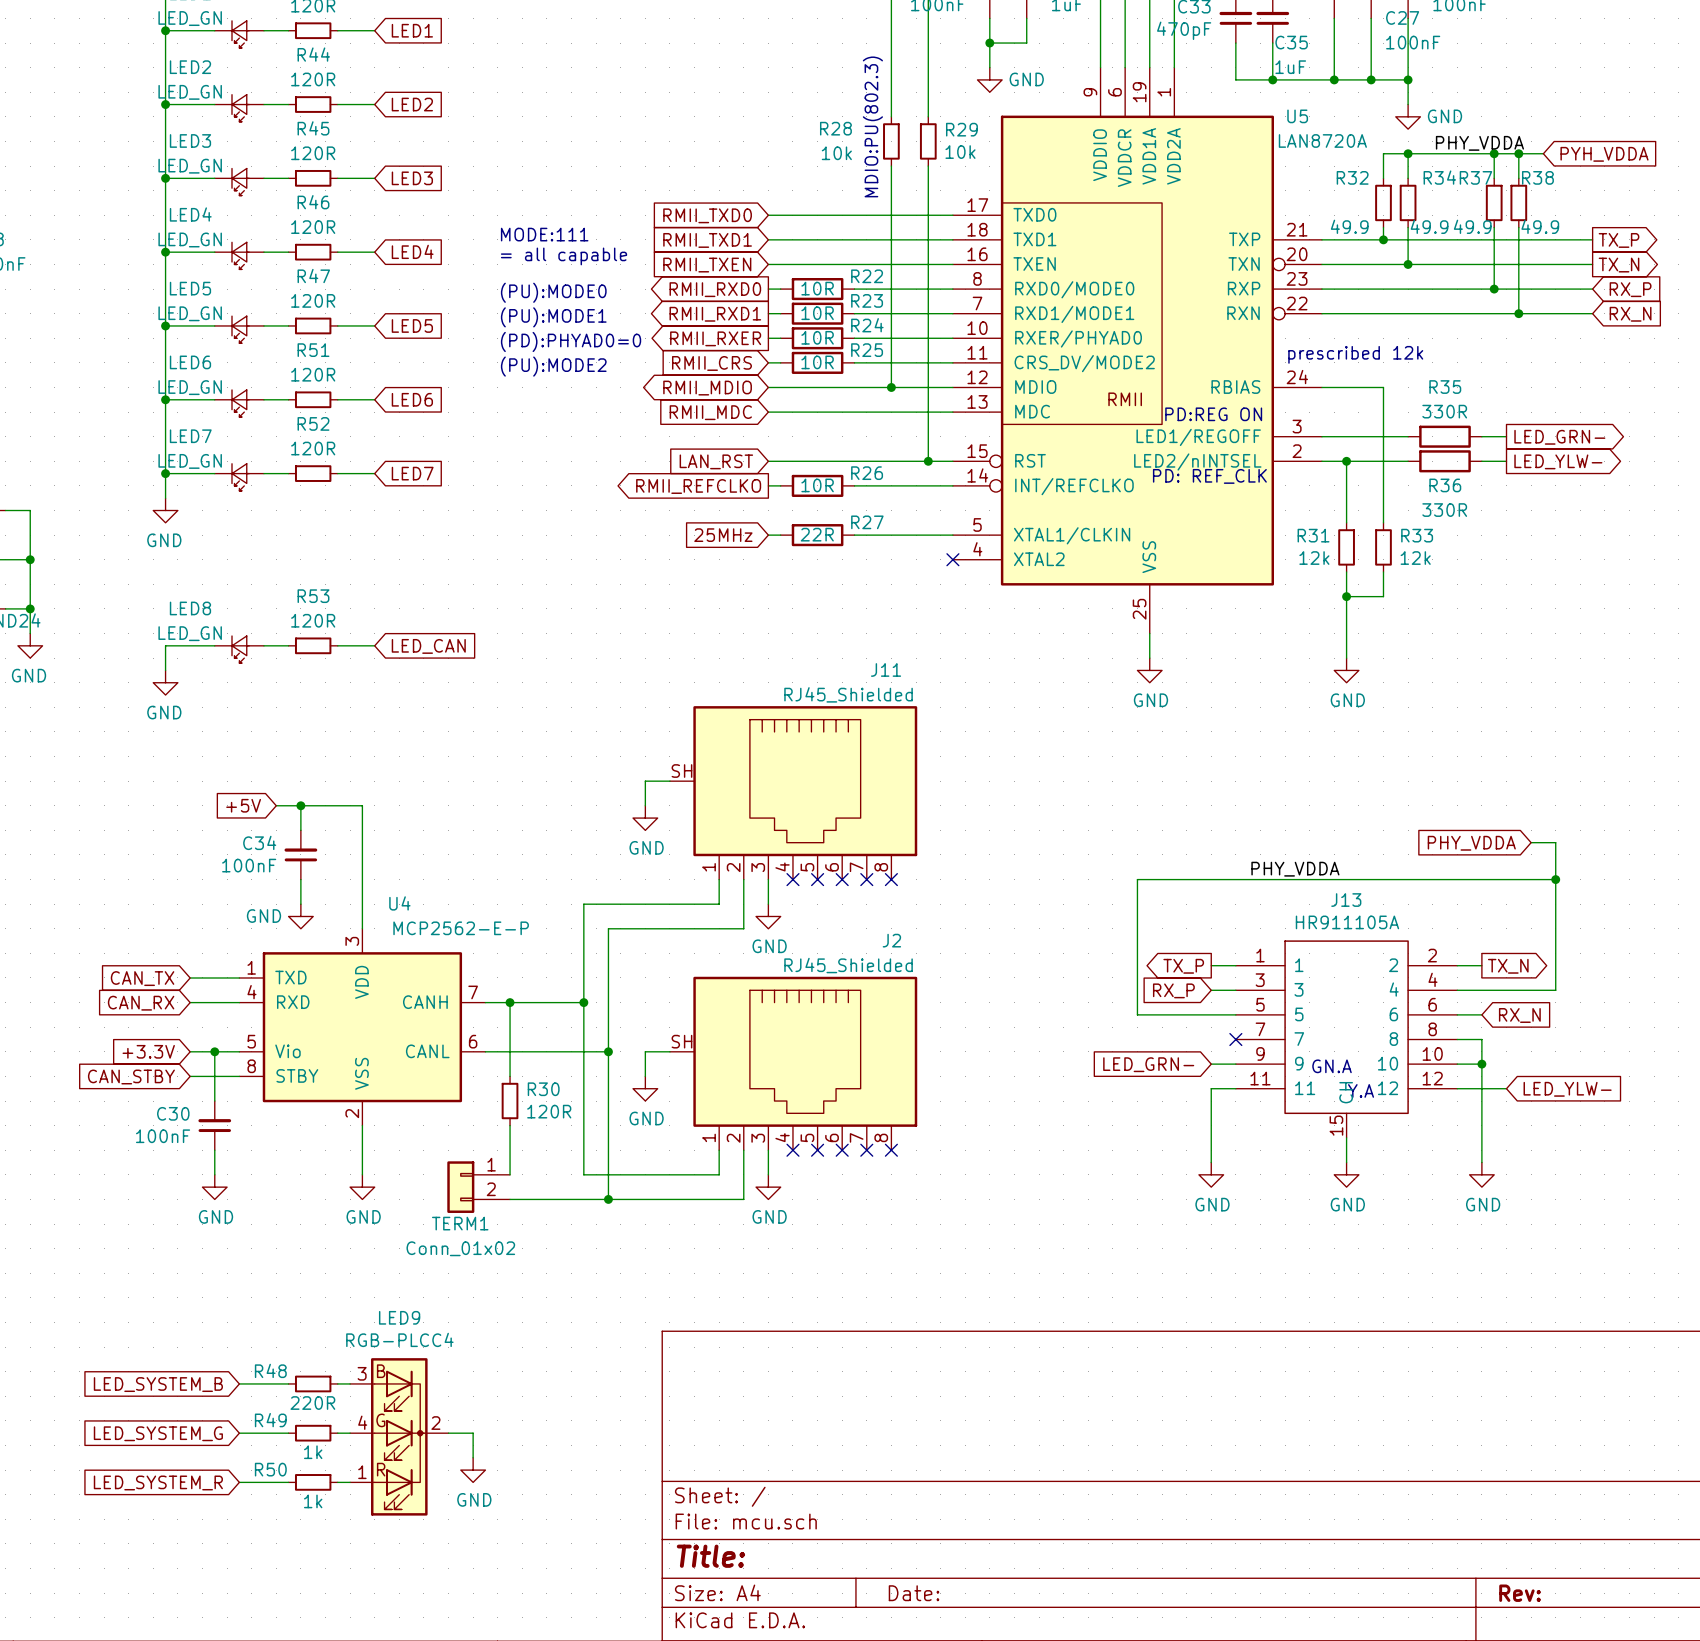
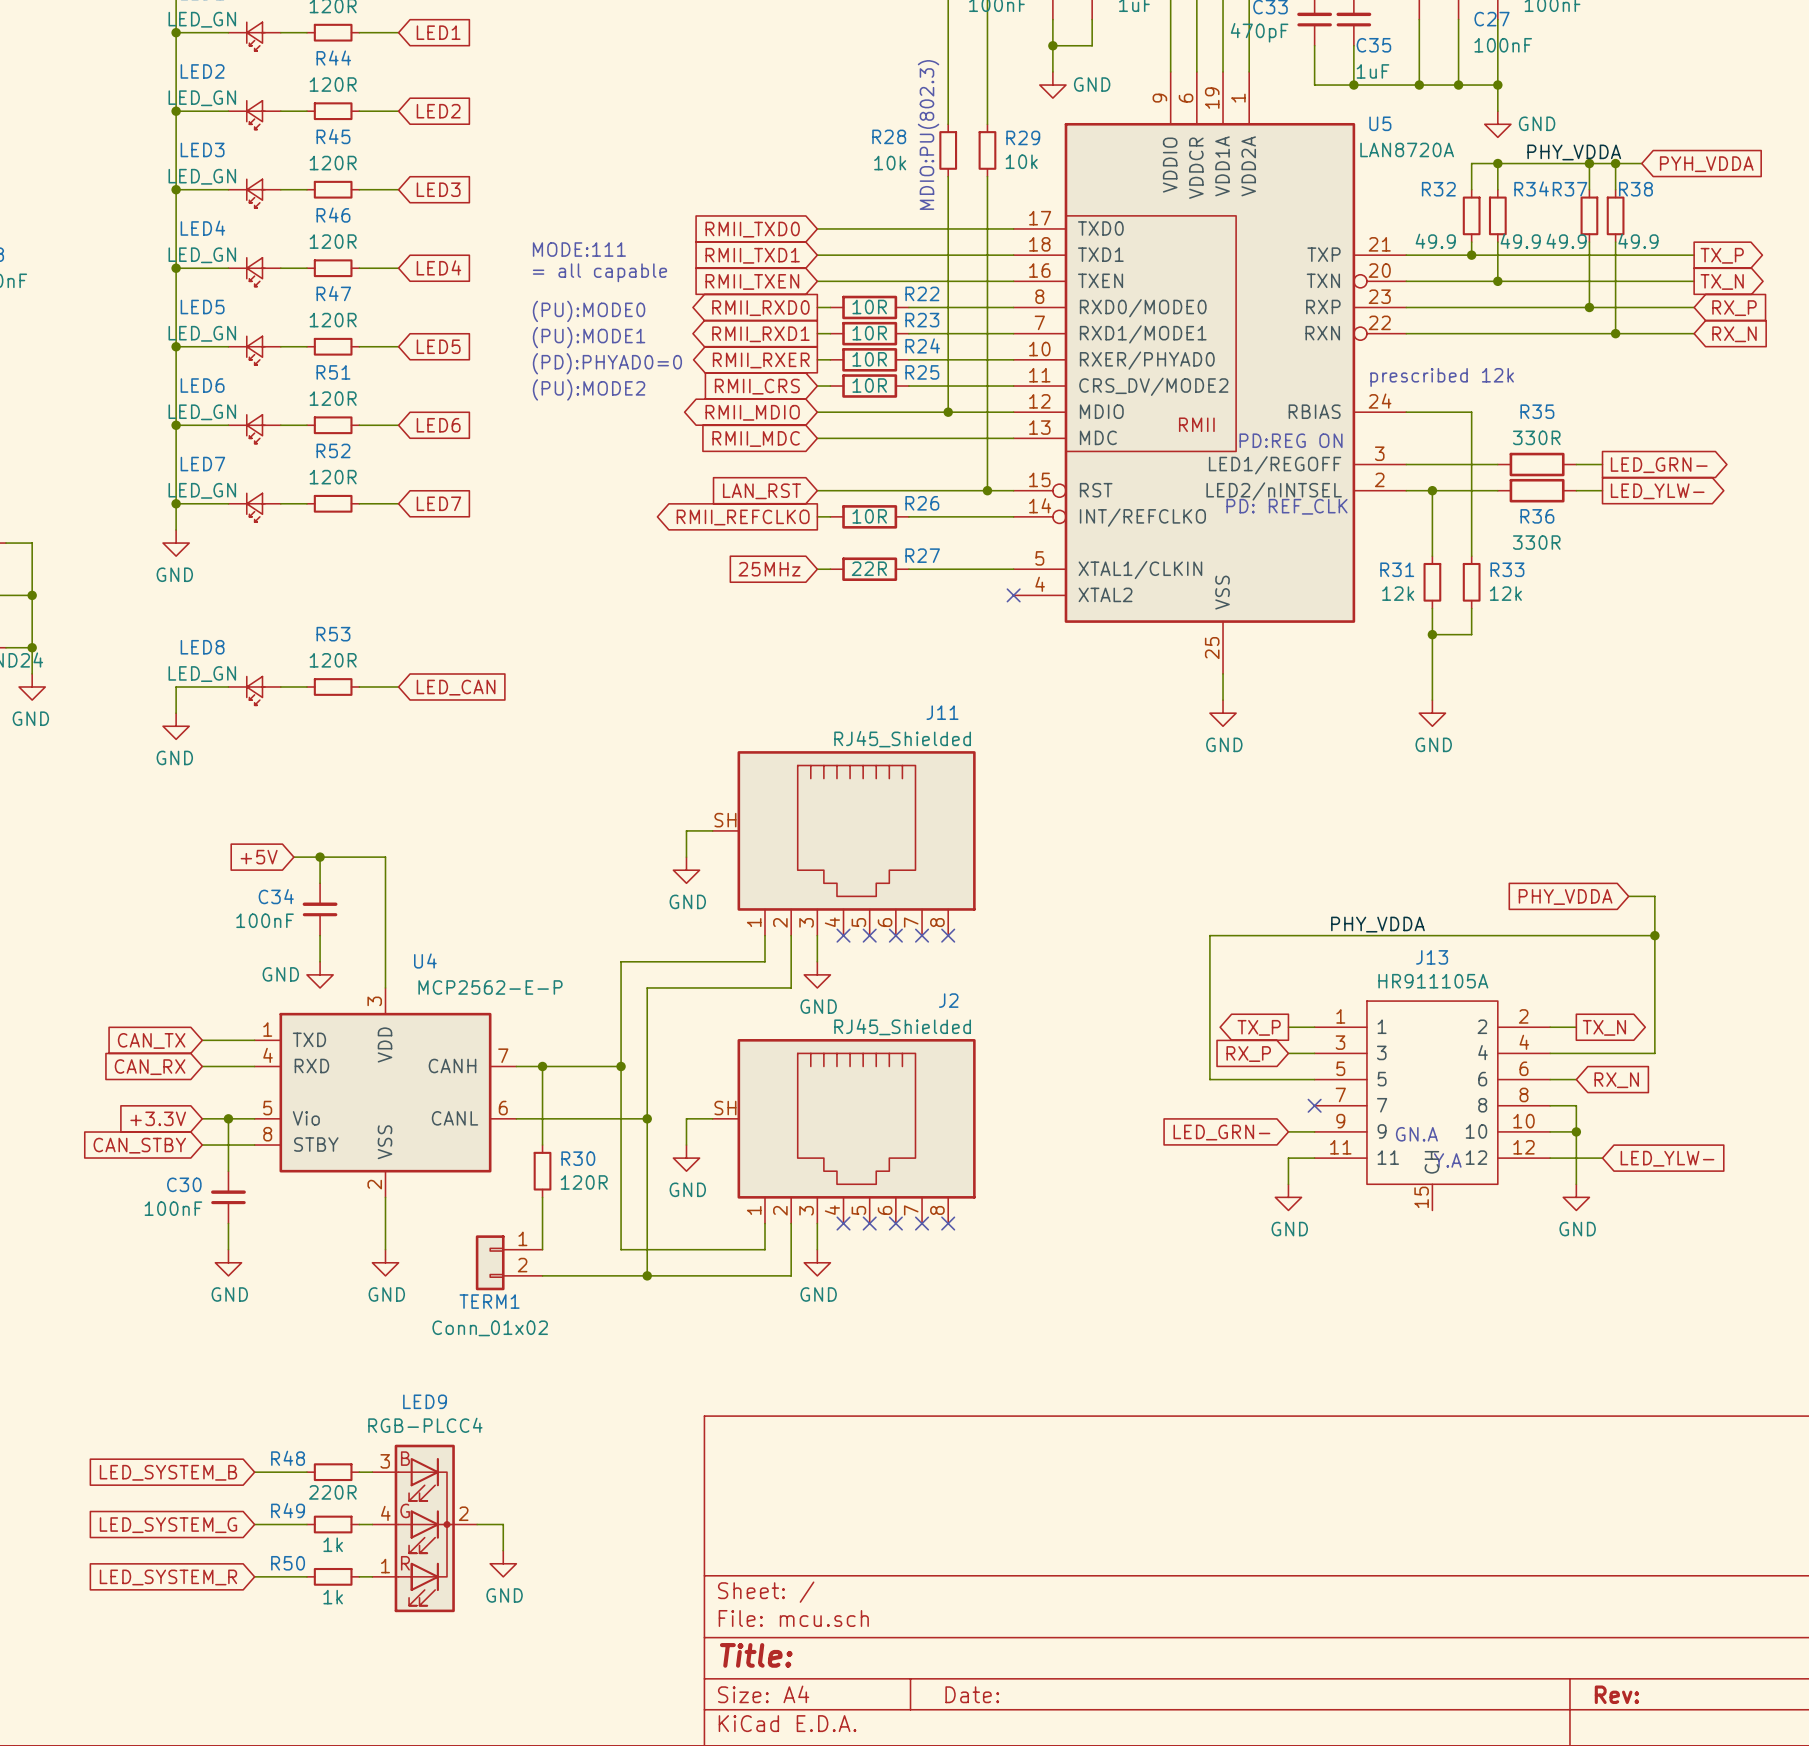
wire: (1211, 1113) (1211, 1162) -> none
wire: (1481, 1113) (1481, 1162) -> none
wire: (1346, 1137) (1346, 1162) -> none
power symbol position: GND (1211, 1174) -> GND (1288, 1197)
power symbol: GND (1346, 1174) -> none
power symbol position: GND (1481, 1174) -> GND (1576, 1197)

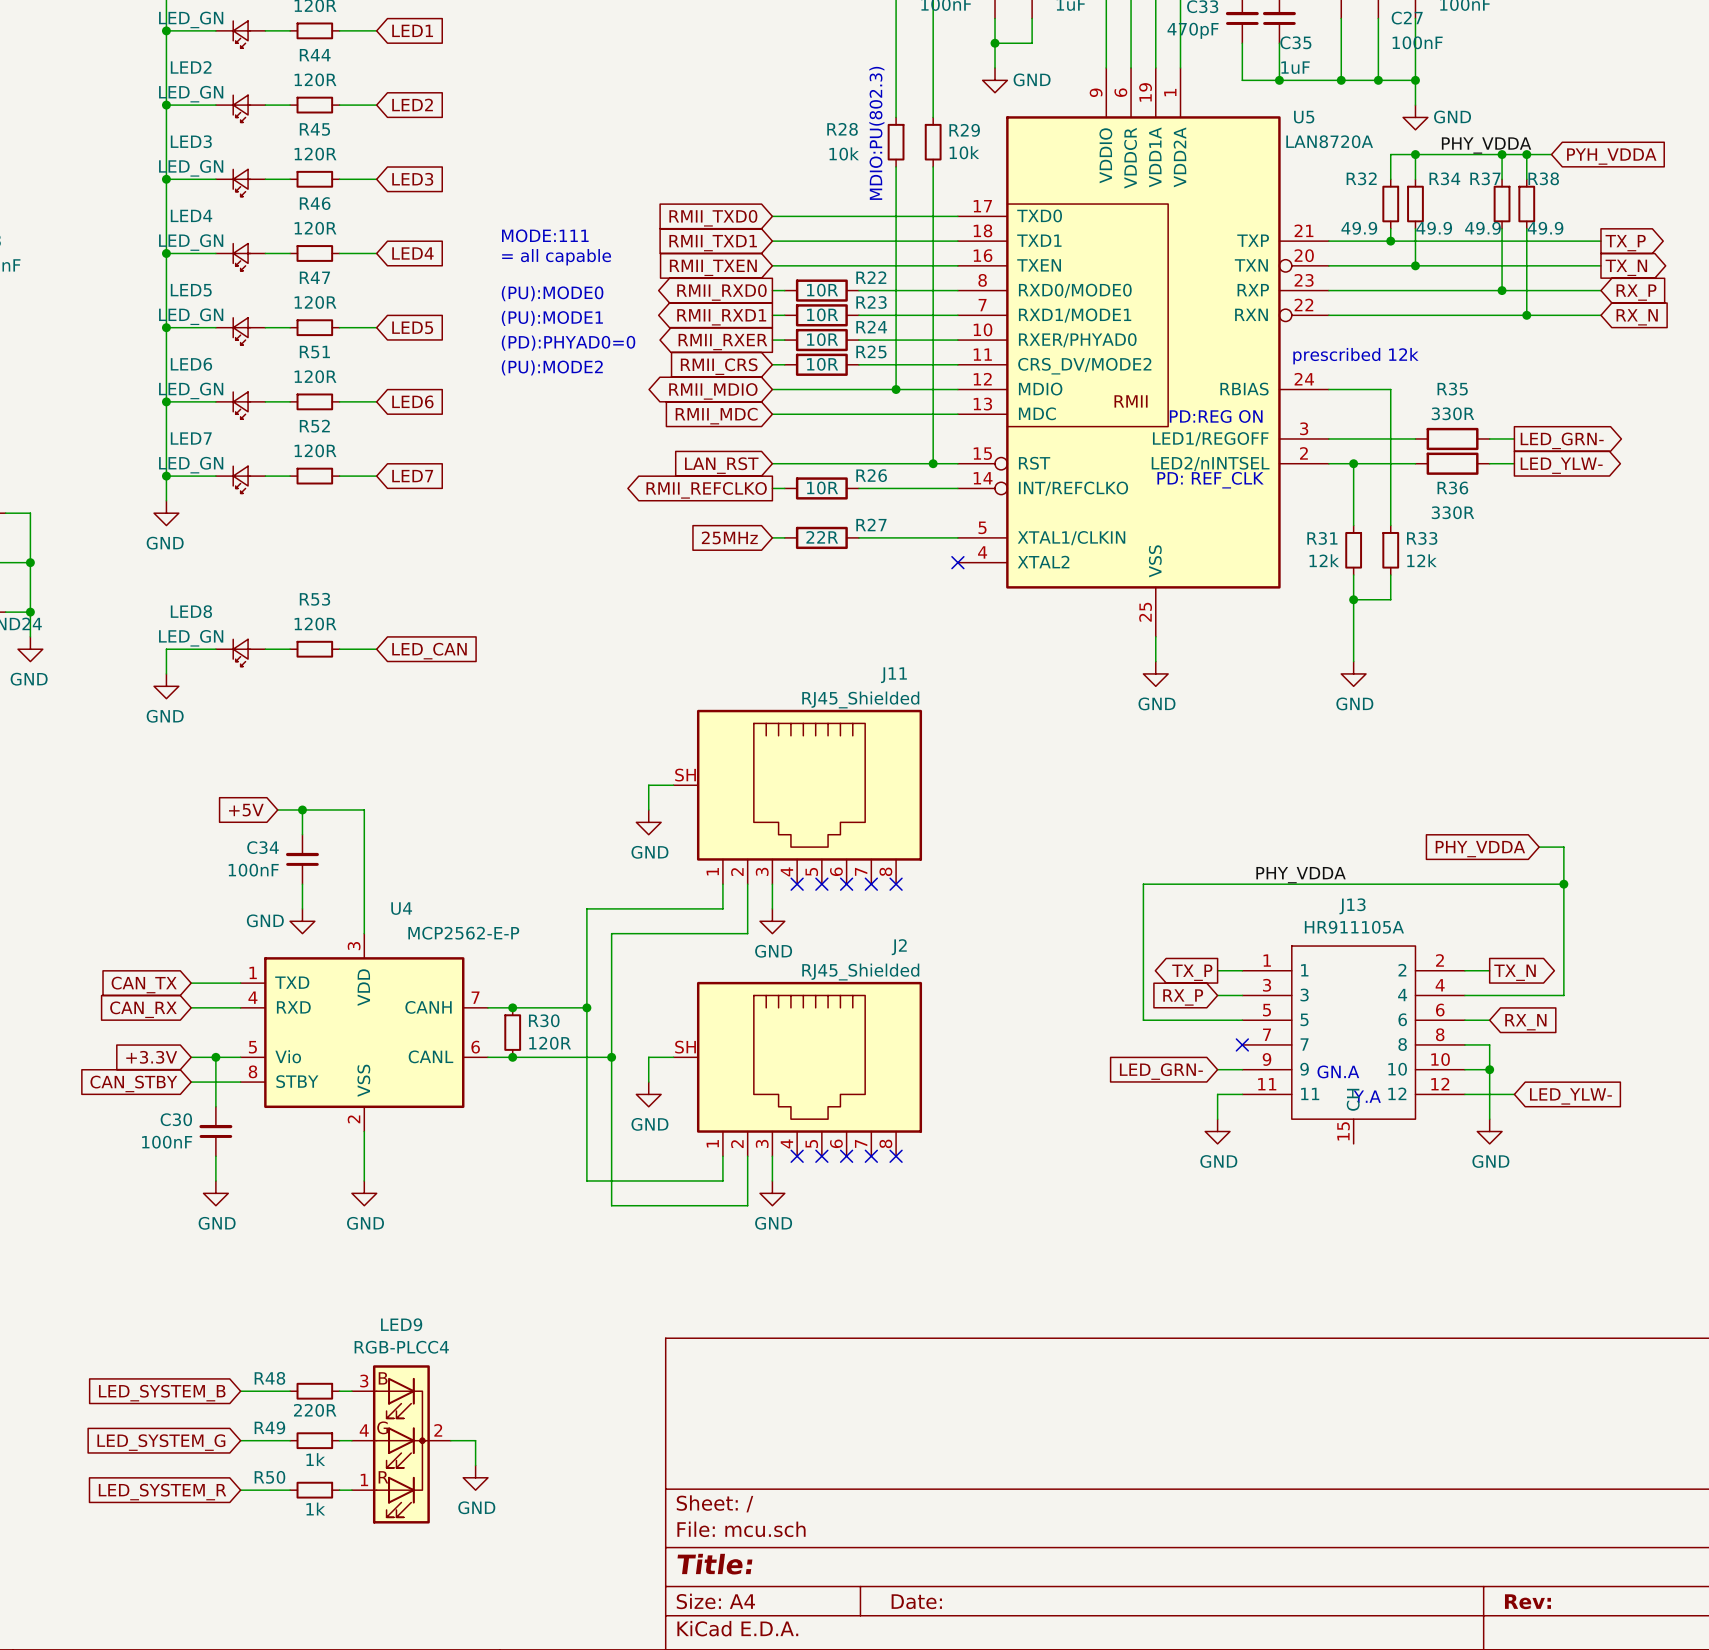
wire: (542, 1066) (542, 1145) -> none
junction: none -> (512, 1057)
R30 position: (542, 1171) -> (512, 1032)
wire: (542, 1197) (542, 1249) -> none
TERM1: Conn_01x02 (509, 1262) -> none
wire: (542, 1275) (647, 1275) -> none
junction: (647, 1275) -> none

